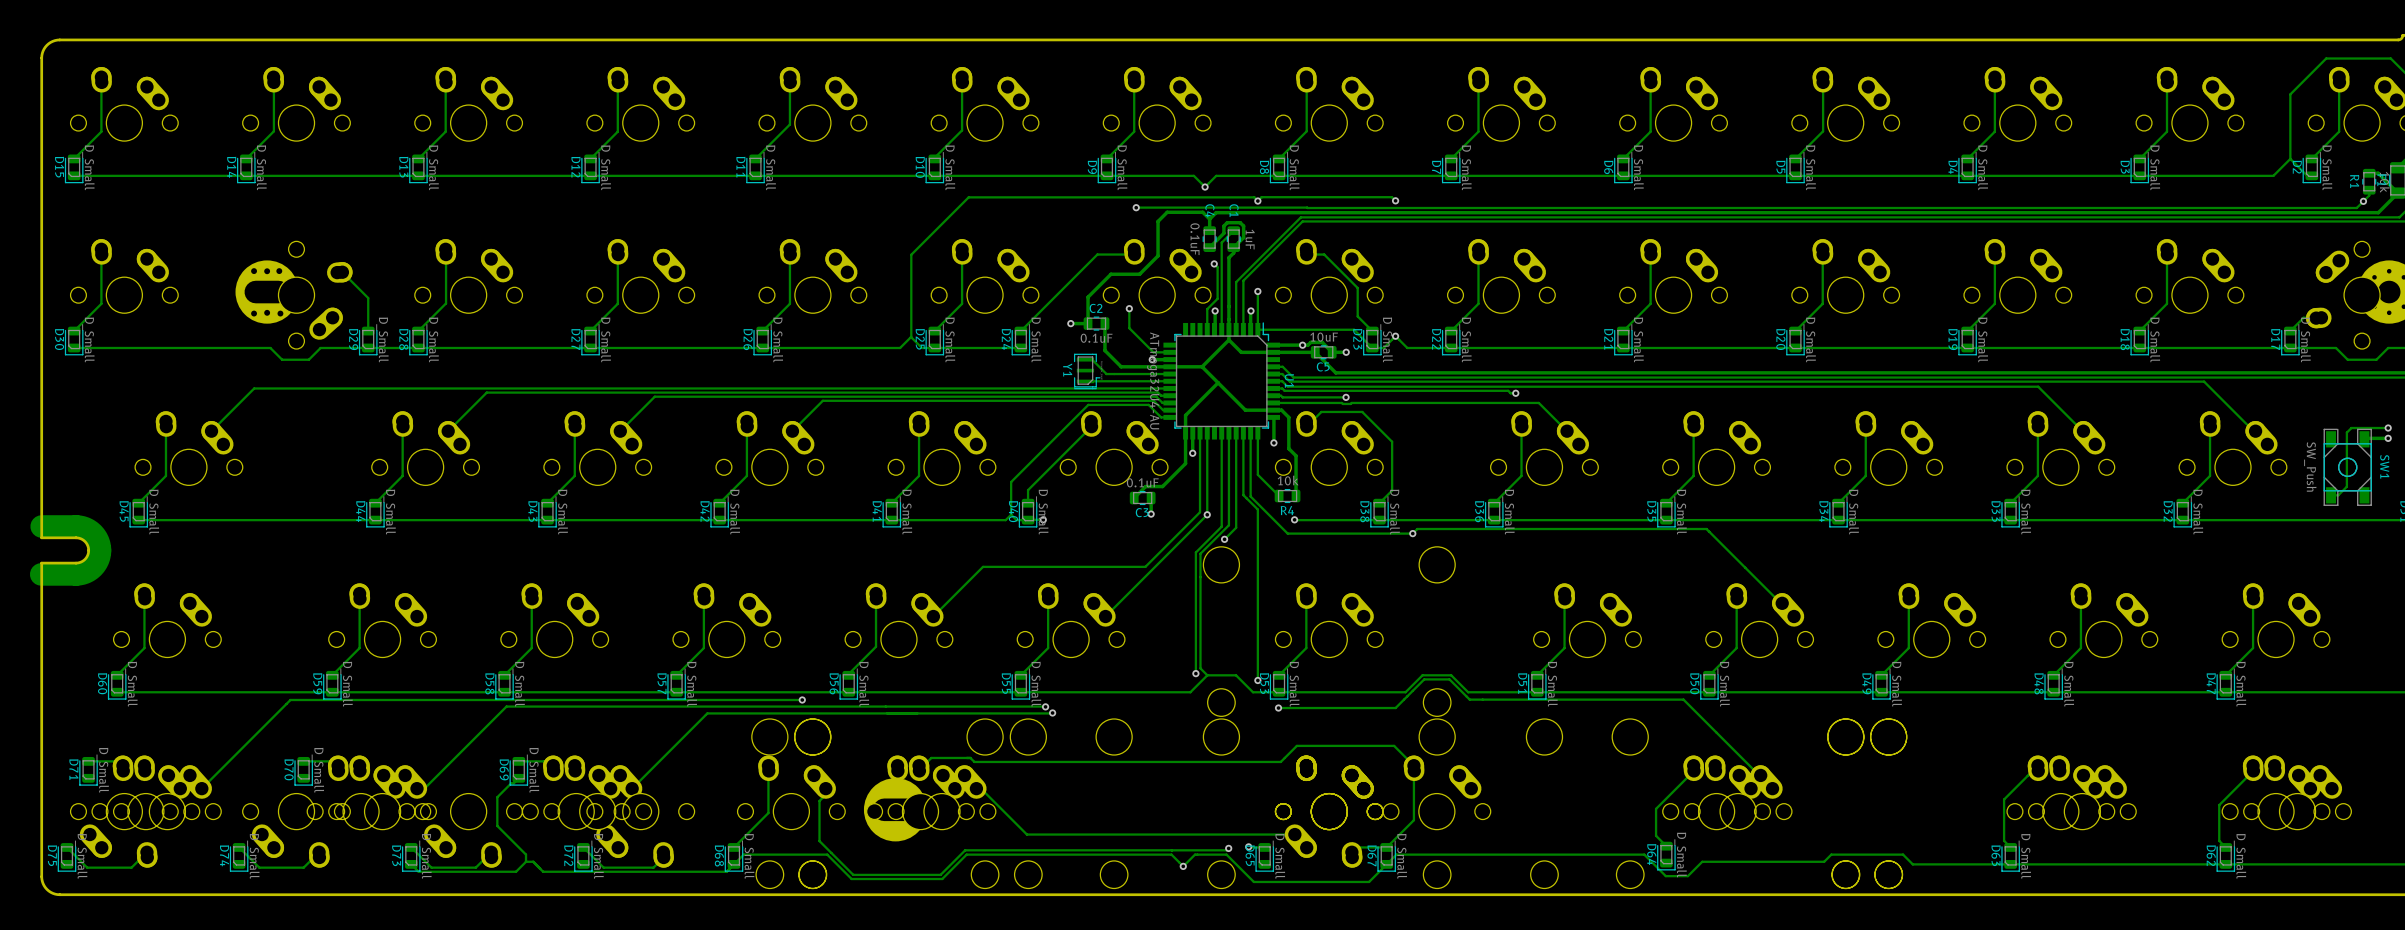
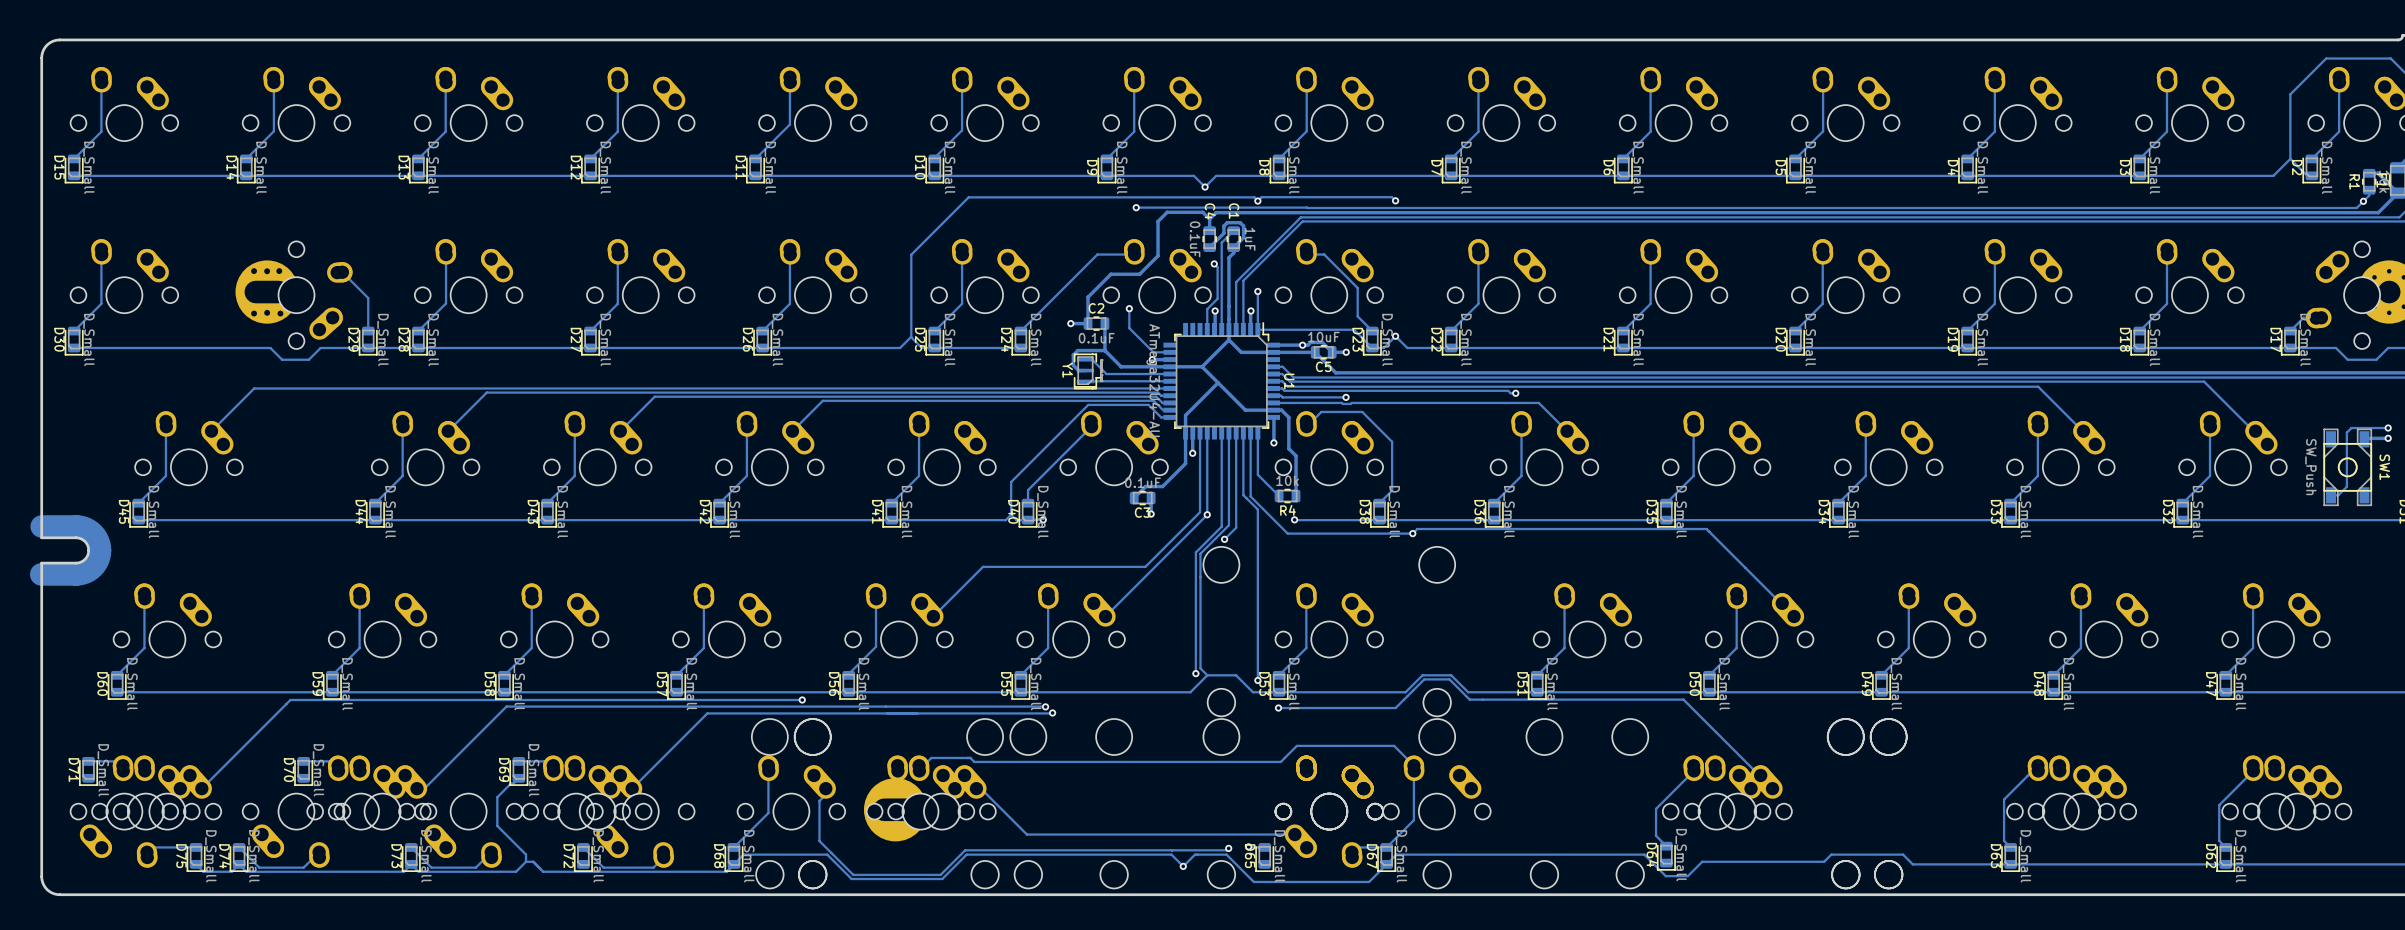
track: none -> (1104, 350) (1077, 350) (1073, 355) (1073, 365) (1078, 370) (1085, 370)
track: (66, 847) (87, 867) (131, 867) (146, 852) -> (196, 847) (151, 847) (146, 852)
D75 position: (66, 857) -> (196, 857)
track: none -> (411, 864) (403, 871) (246, 871) (239, 864) (231, 871) (203, 871) (196, 864)

